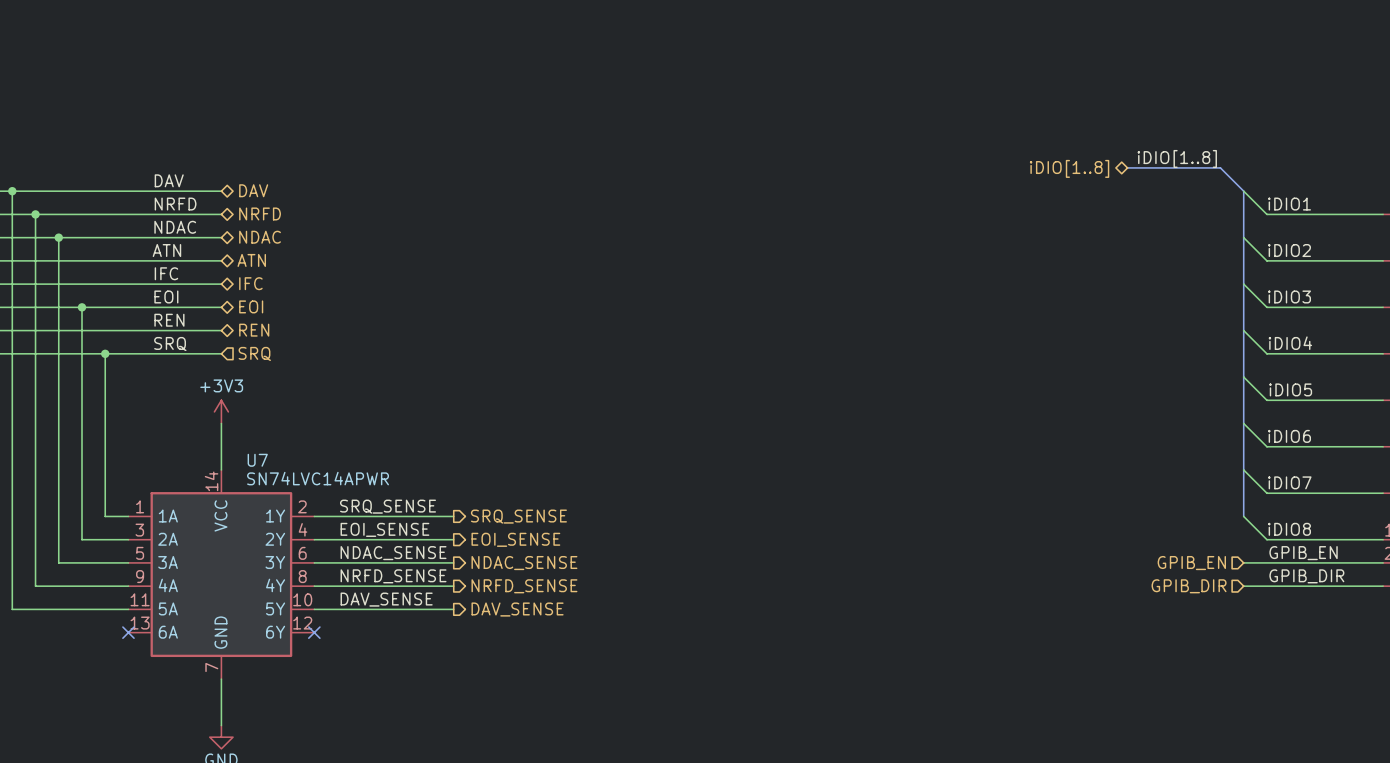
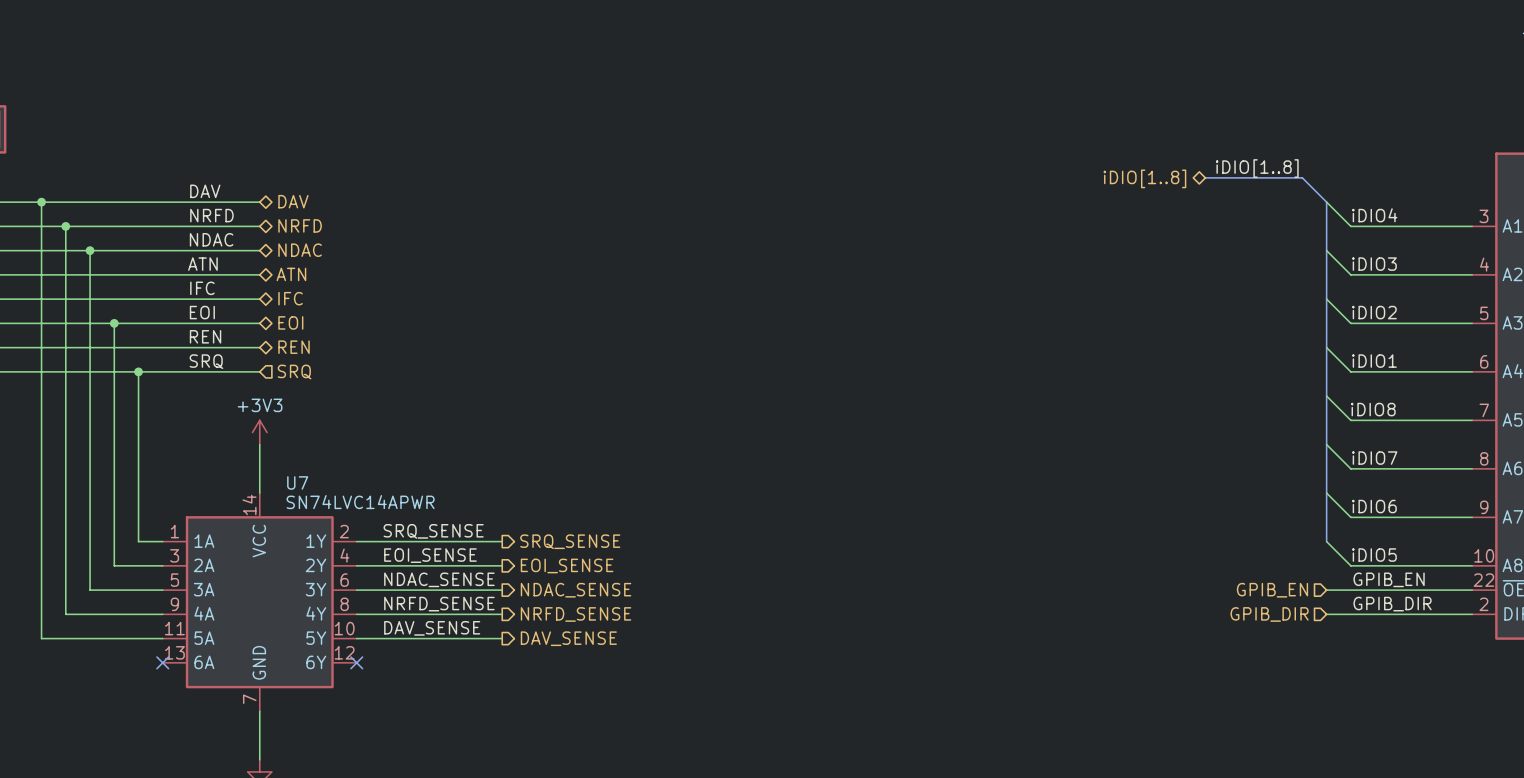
label: iDIO1 (1289, 204) -> iDIO4 (1374, 215)
label: iDIO2 (1289, 250) -> iDIO3 (1374, 264)
label: iDIO3 (1289, 296) -> iDIO2 (1374, 312)
label: iDIO4 (1290, 343) -> iDIO1 (1374, 361)
label: iDIO5 (1290, 389) -> iDIO8 (1373, 409)
label: iDIO6 (1289, 436) -> iDIO7 (1374, 458)
label: iDIO7 (1289, 482) -> iDIO6 (1374, 506)
label: iDIO8 (1289, 529) -> iDIO5 (1374, 555)

